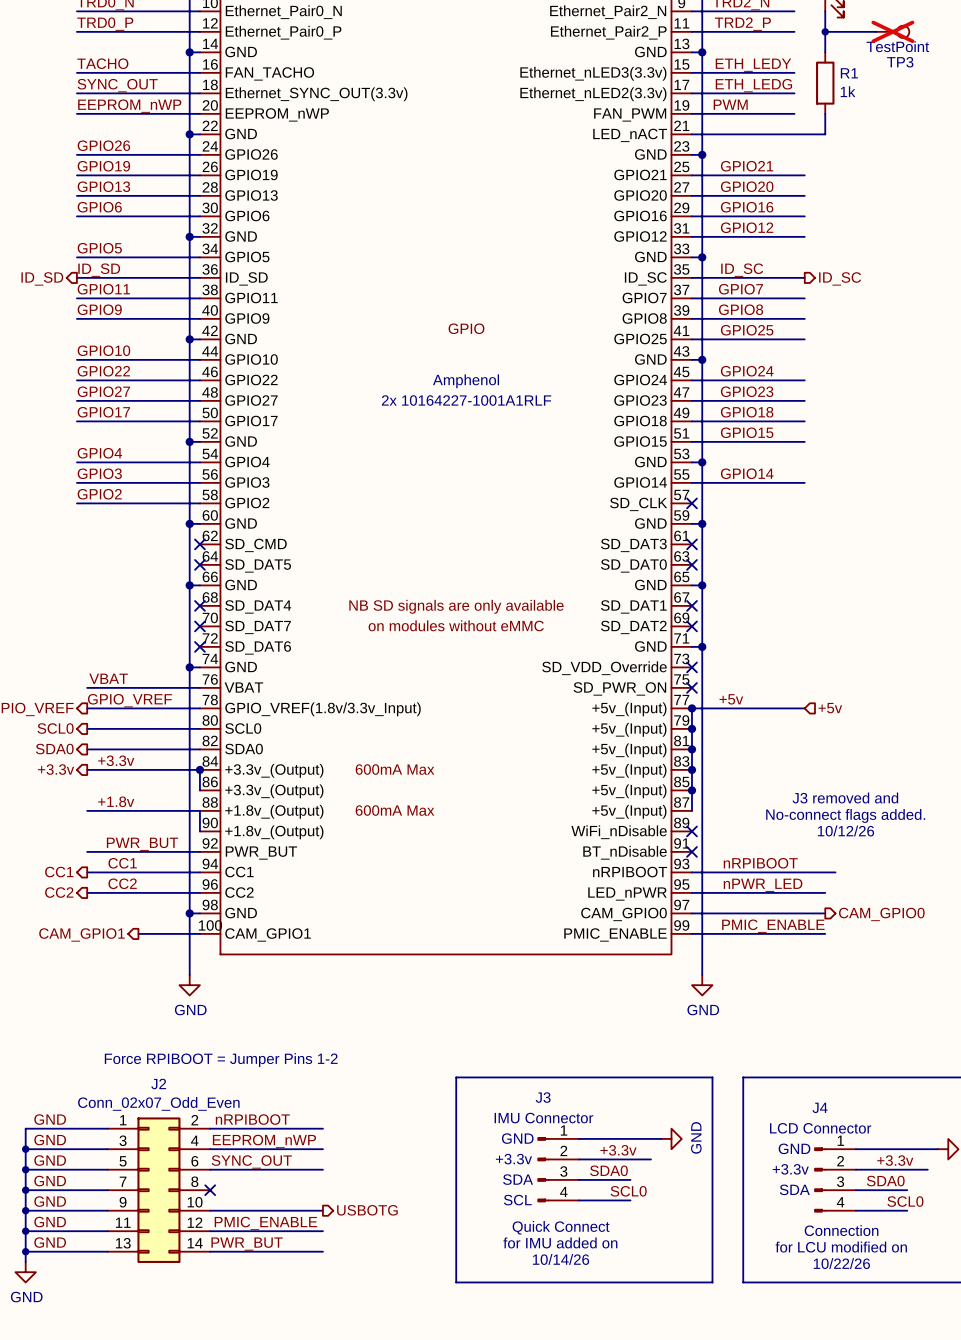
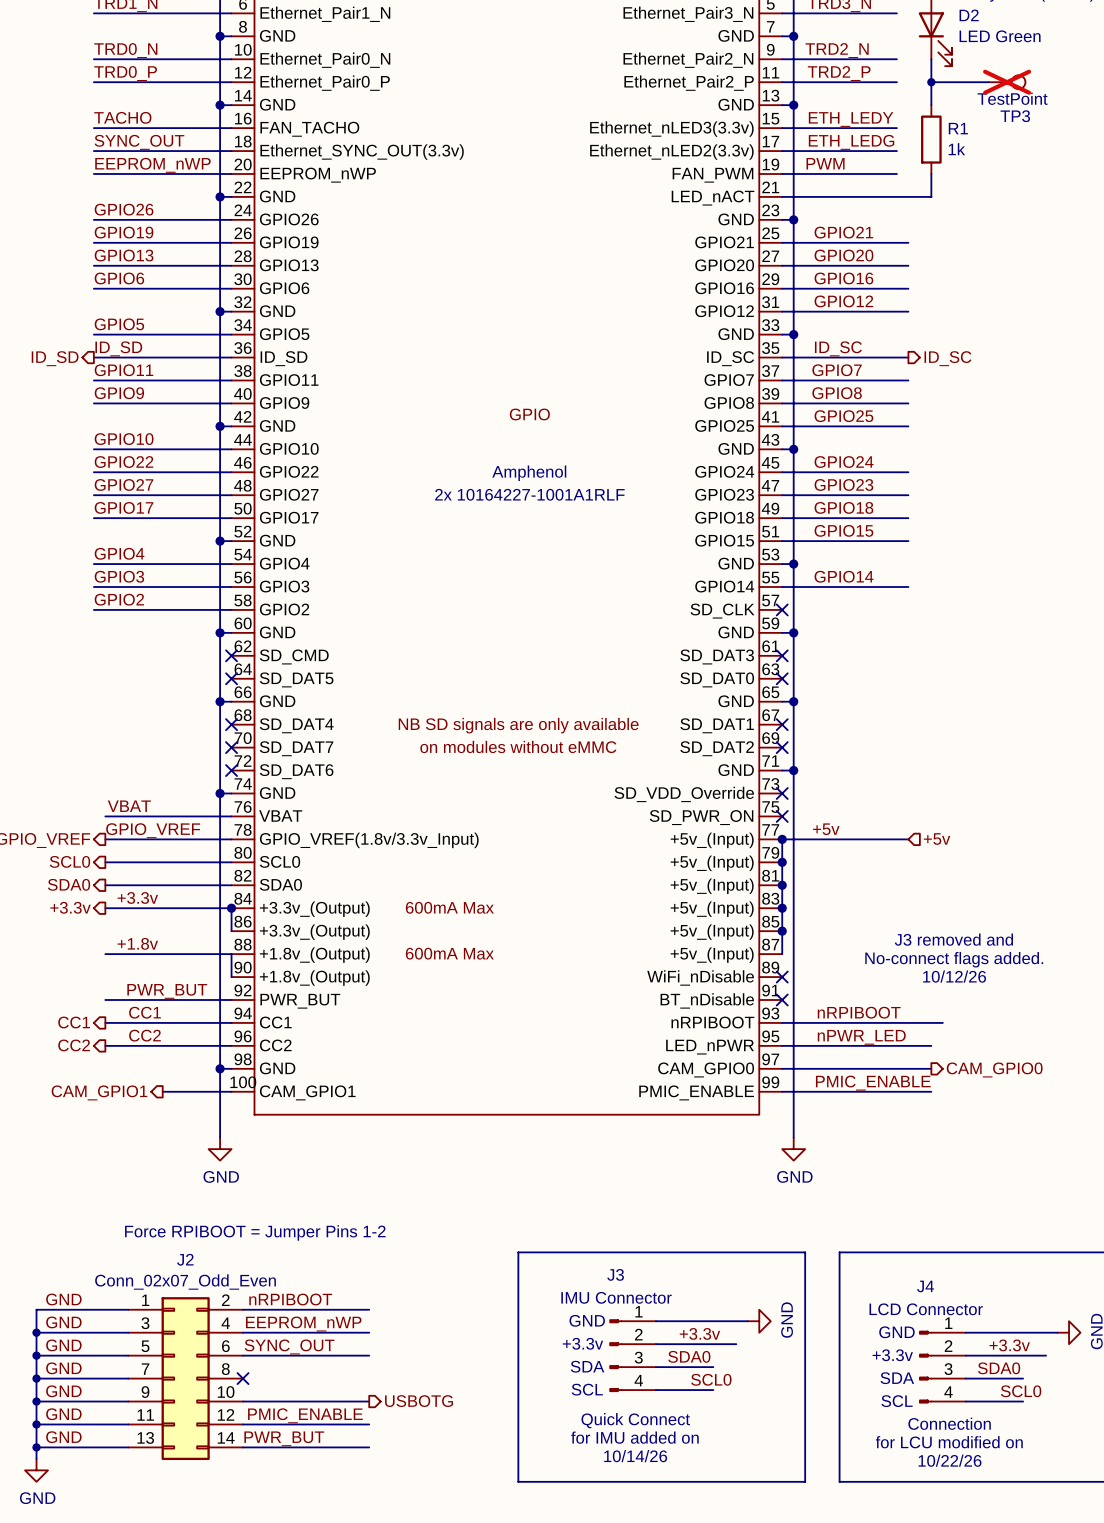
text: none -> SCL (897, 1401)

